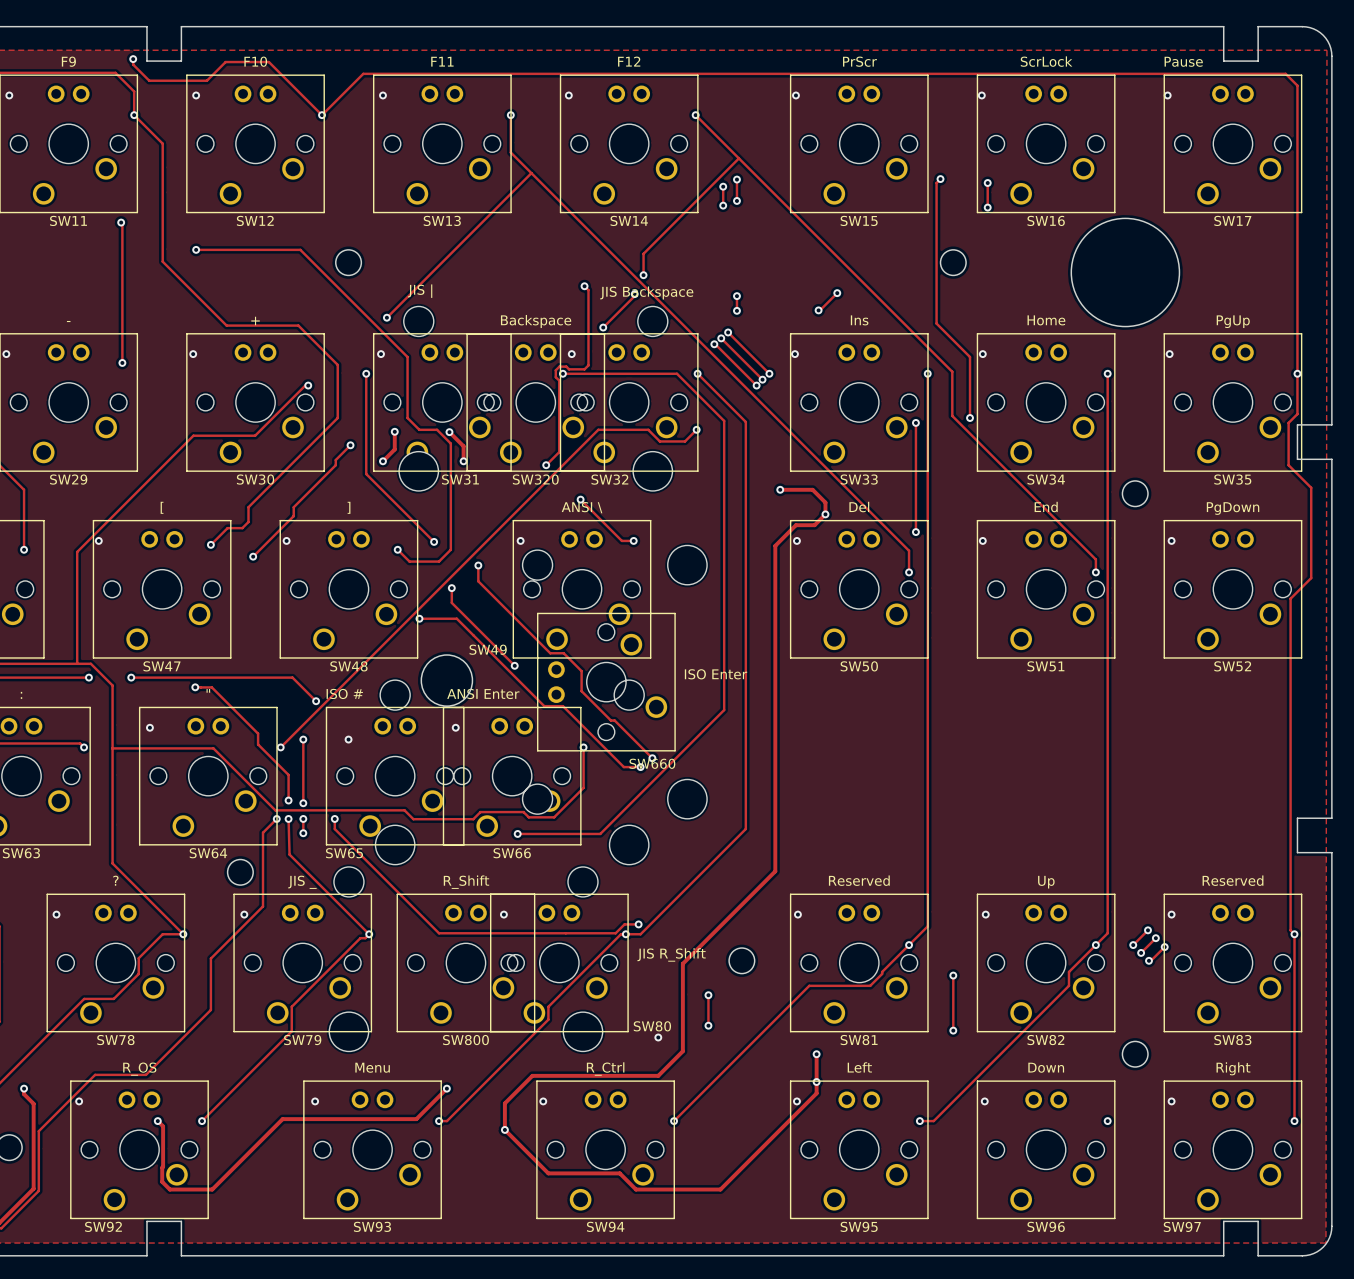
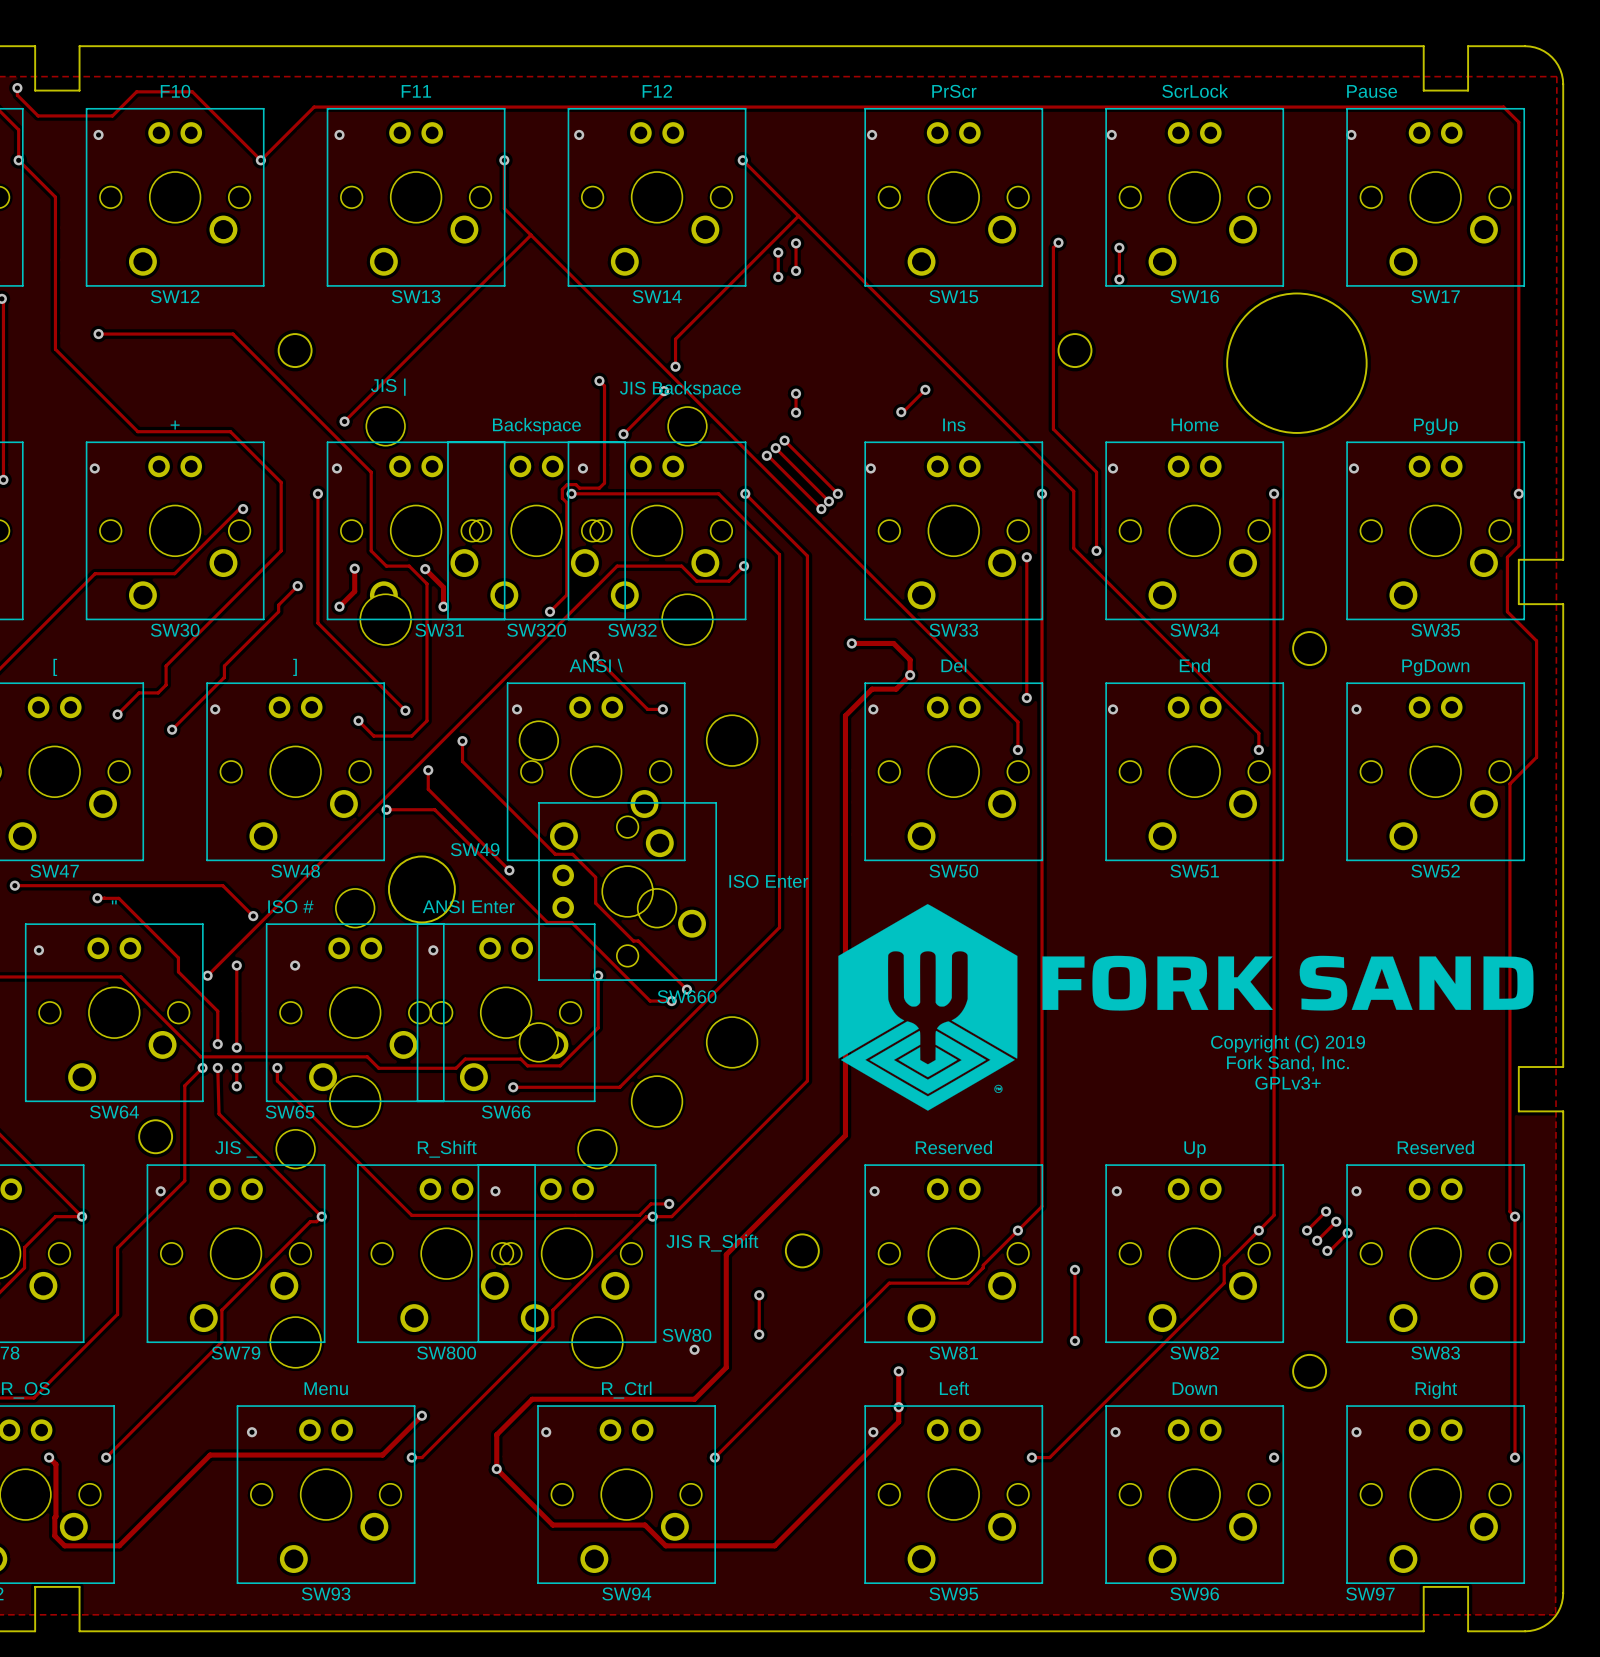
drawing: none -> [838, 904, 1018, 1111]
drawing: none -> [1042, 955, 1534, 1011]
text: none -> Copyright (C) 2019 (1288, 1043)
text: none -> Fork Sand, Inc. (1287, 1063)
text: none -> GPLv3+ (1288, 1083)

